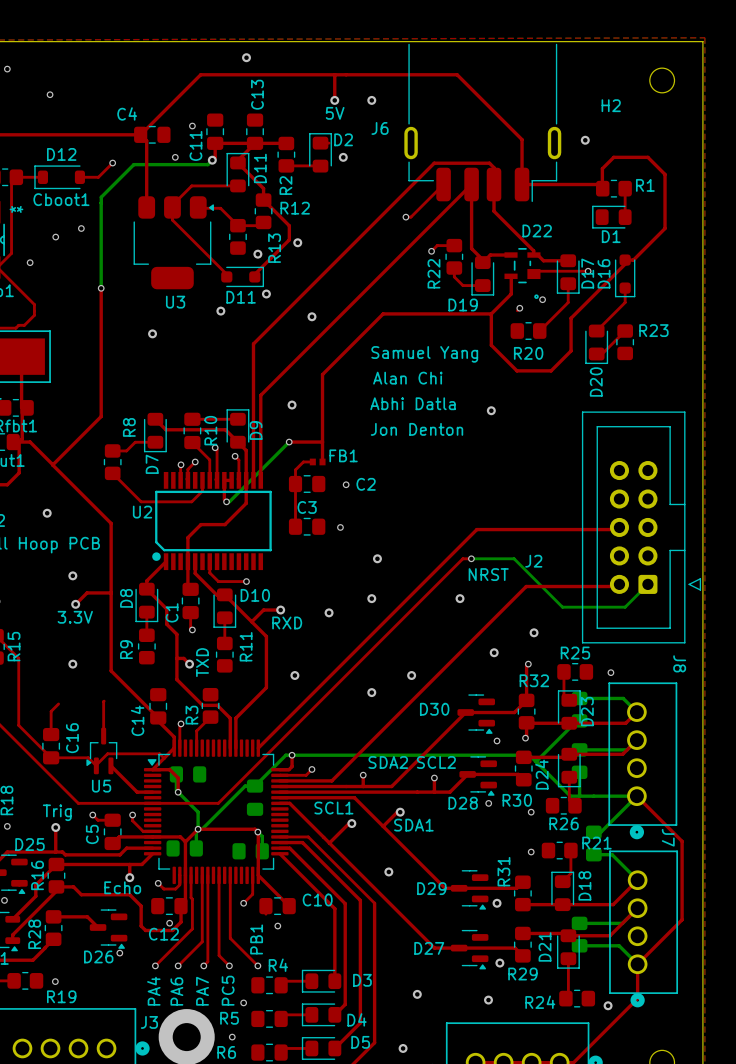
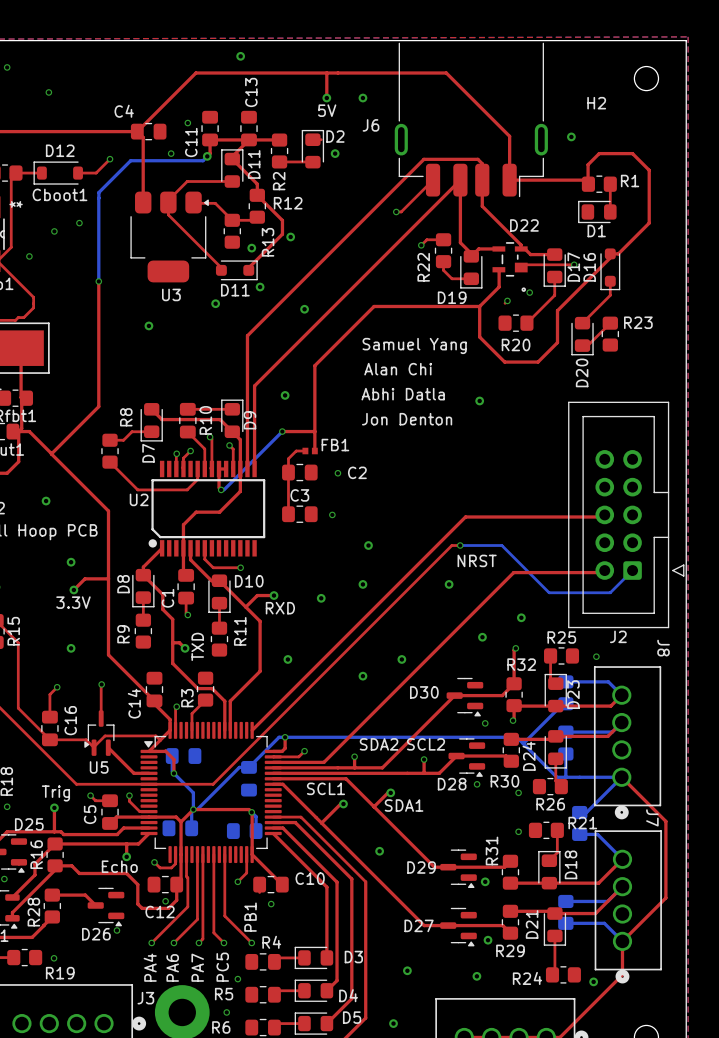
J2 name position: J2 (533, 561) -> J2 (618, 636)
via: none -> (101, 684)
via: none -> (57, 687)

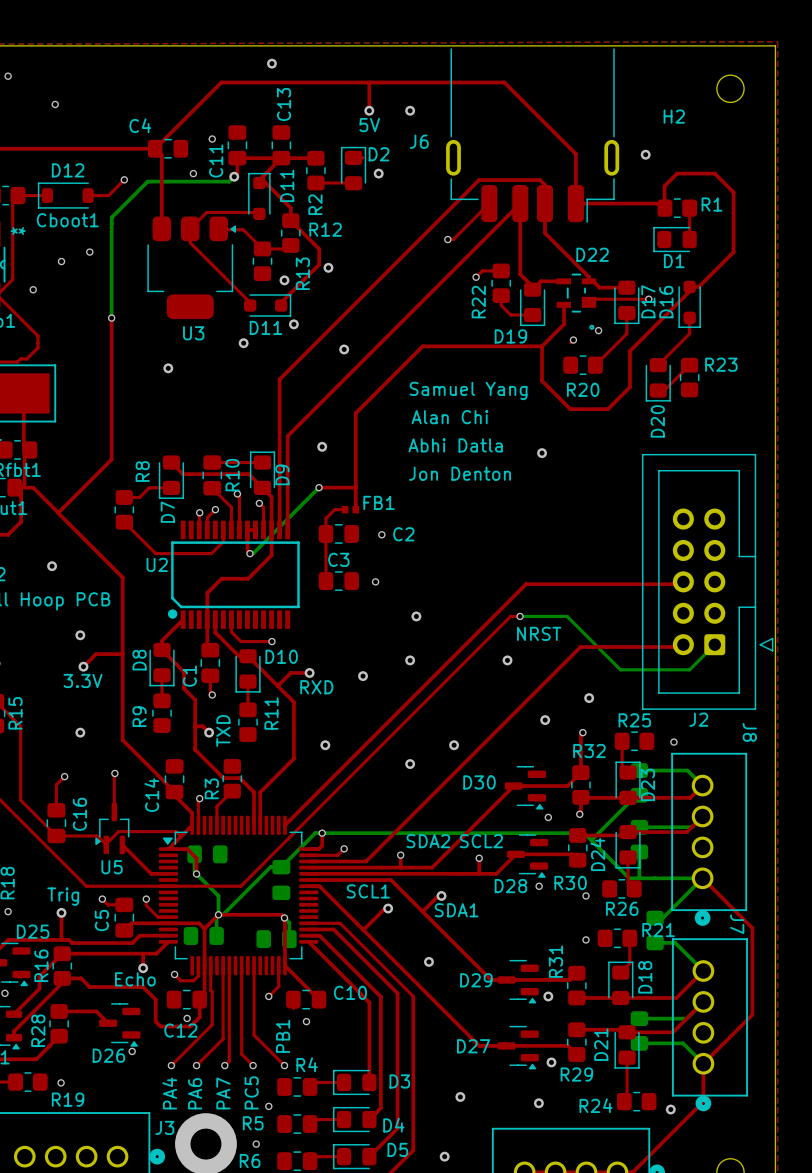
D11 footprint: [221, 149, 244, 188] -> [248, 172, 271, 221]
top track: (232, 181) (187, 181) (168, 200) -> none
top track: none -> (259, 213) (206, 212) (190, 228)

